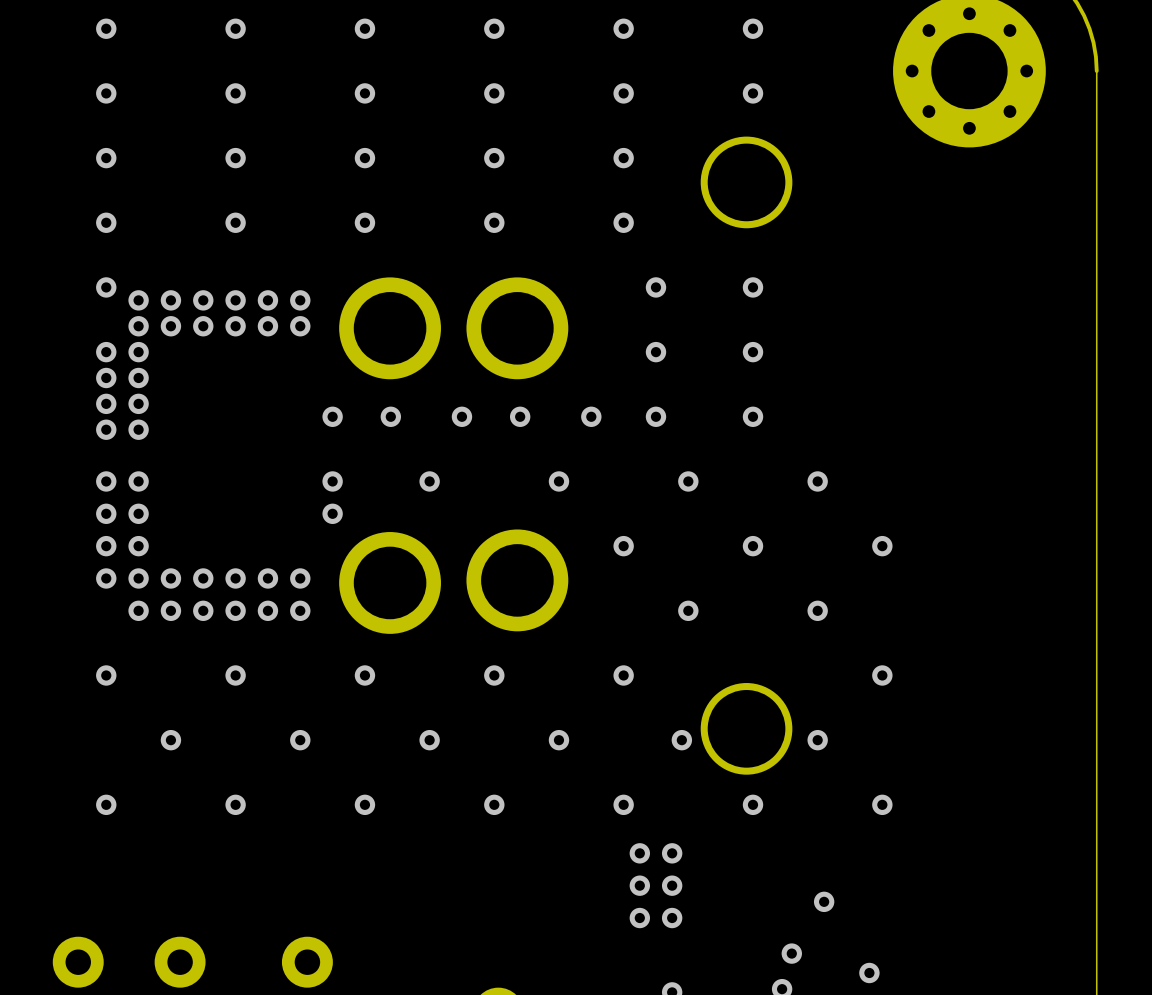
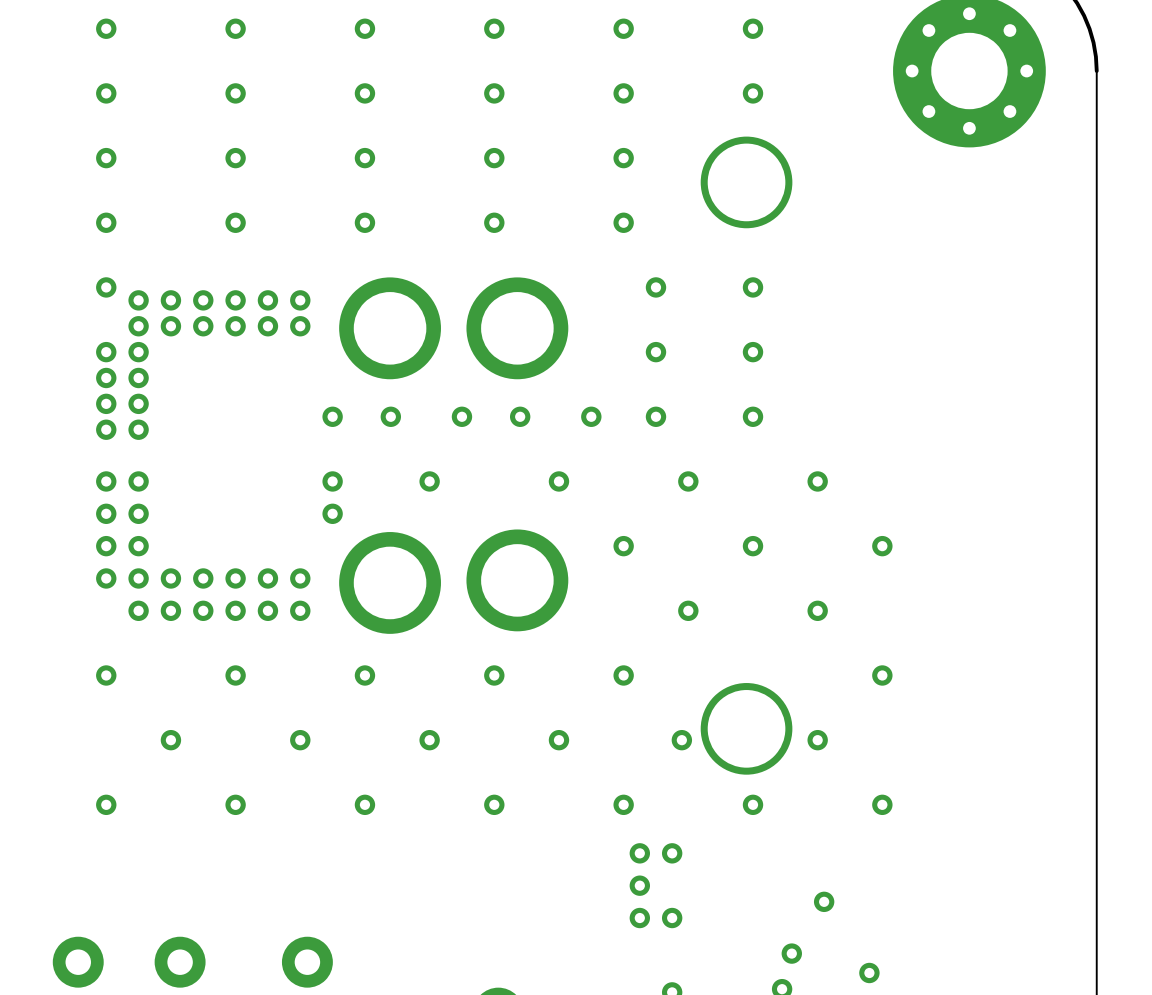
via: (672, 885) -> none

